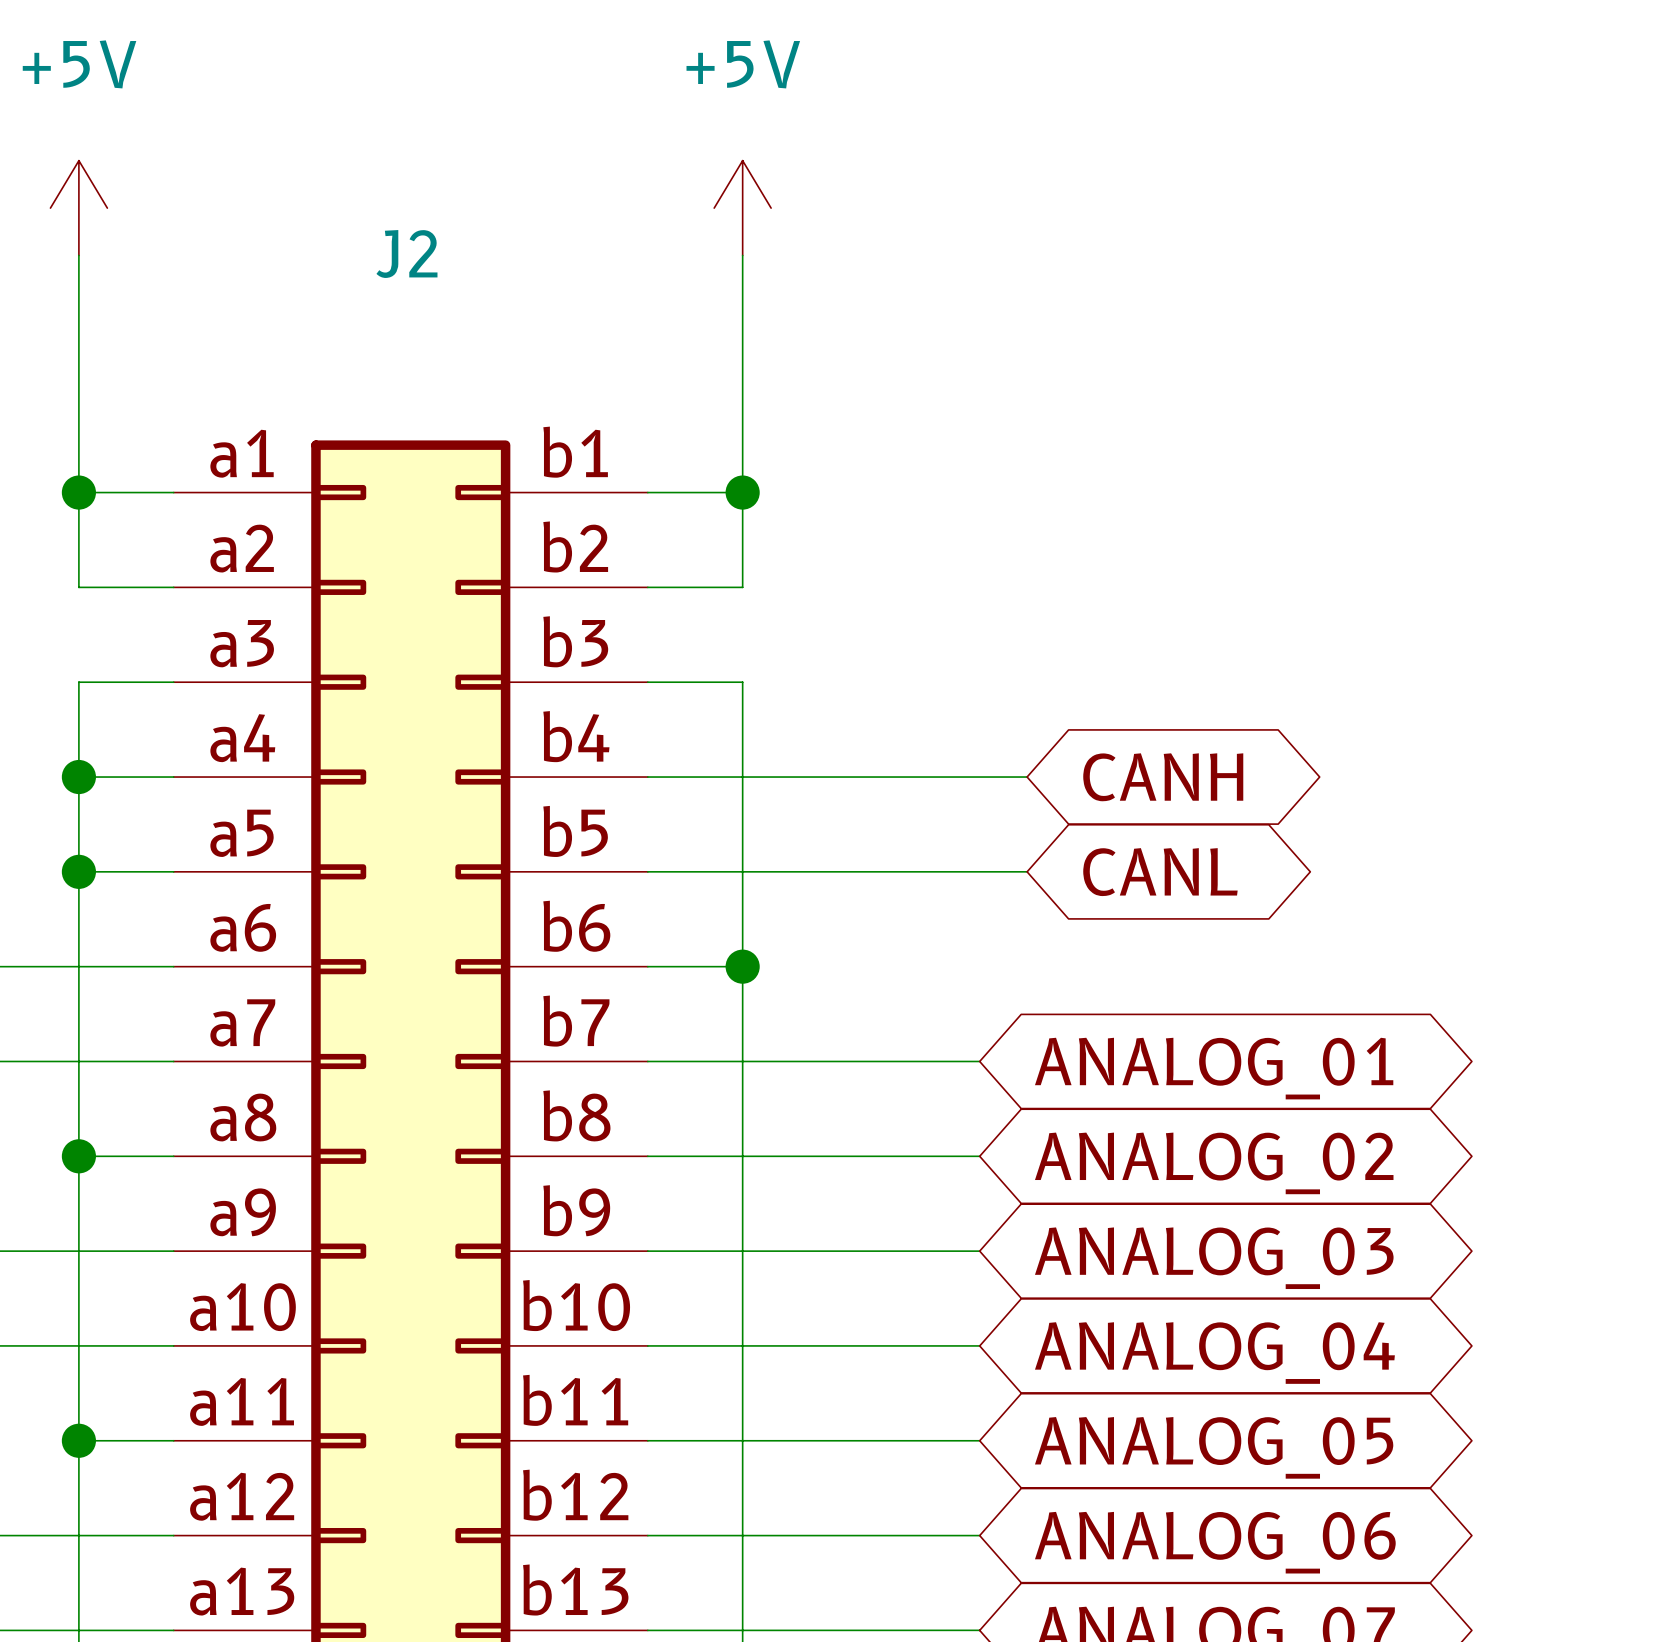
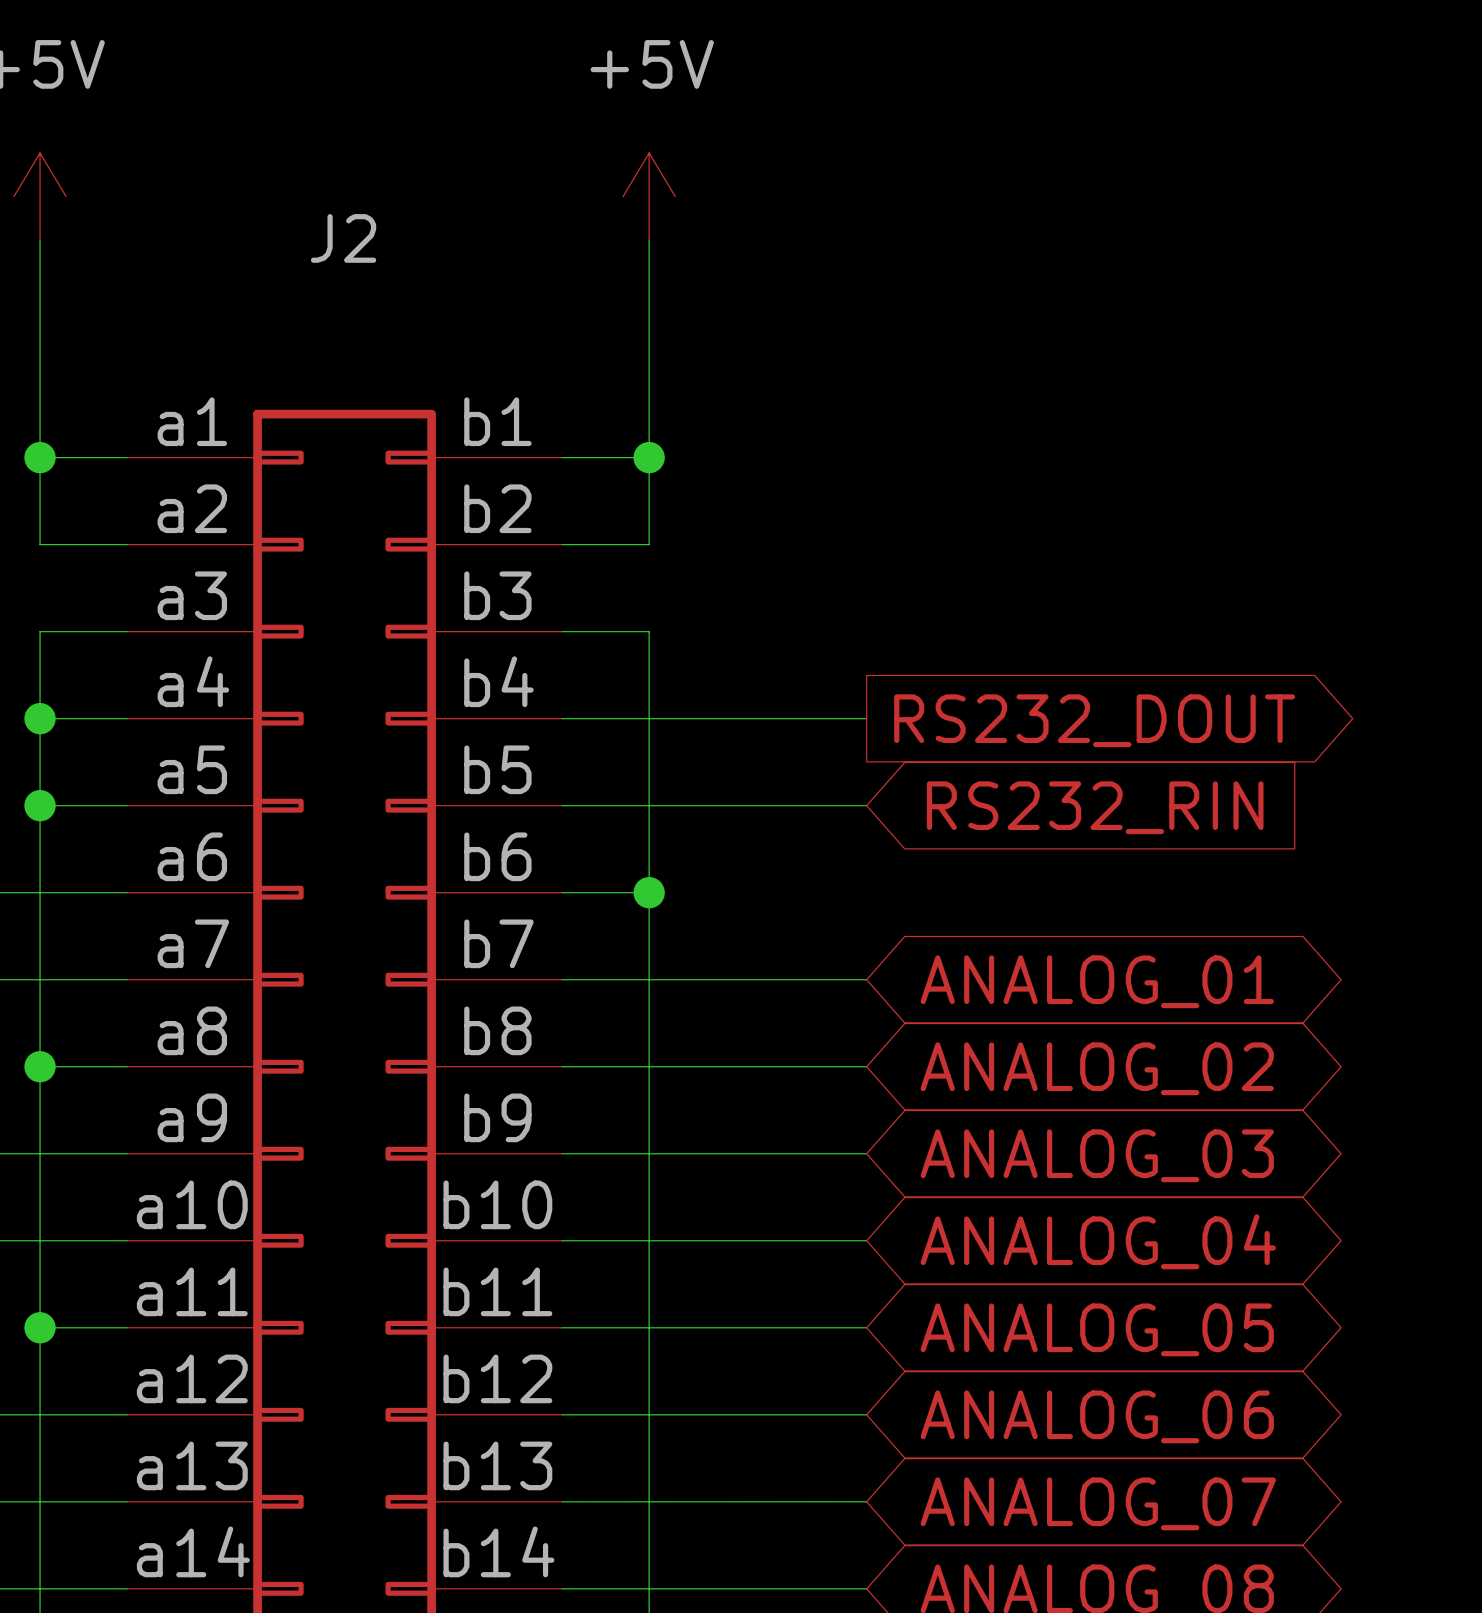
wire: (979, 777) (1027, 777) -> none
global label: CANH (1163, 777) -> none
global label: none -> RS232_DOUT (1094, 720)
wire: (979, 871) (1027, 871) -> none
global label: CANL (1160, 872) -> none
global label: none -> RS232_RIN (1095, 807)

